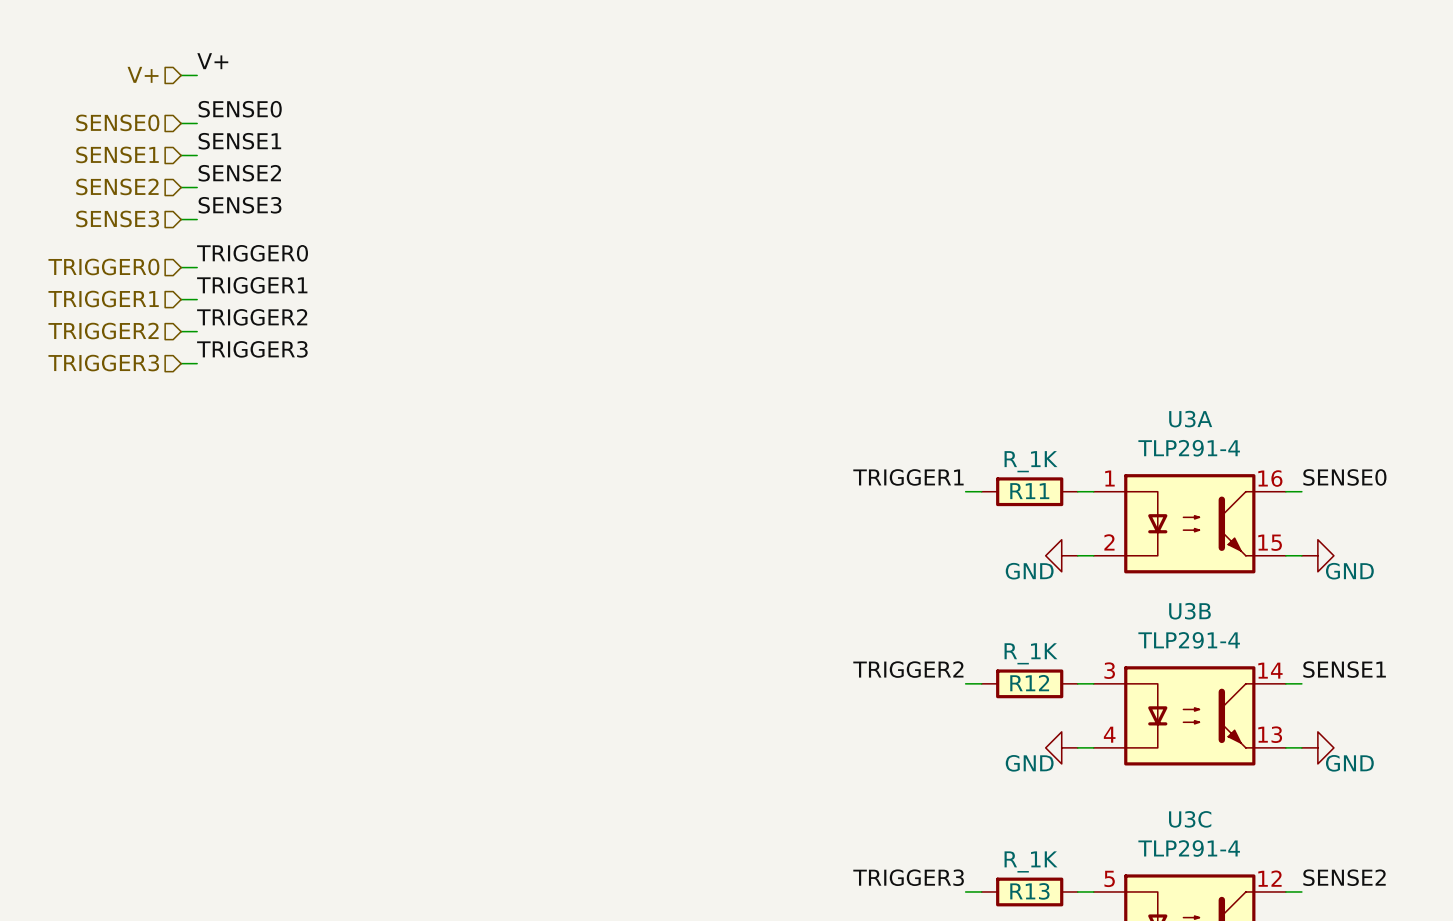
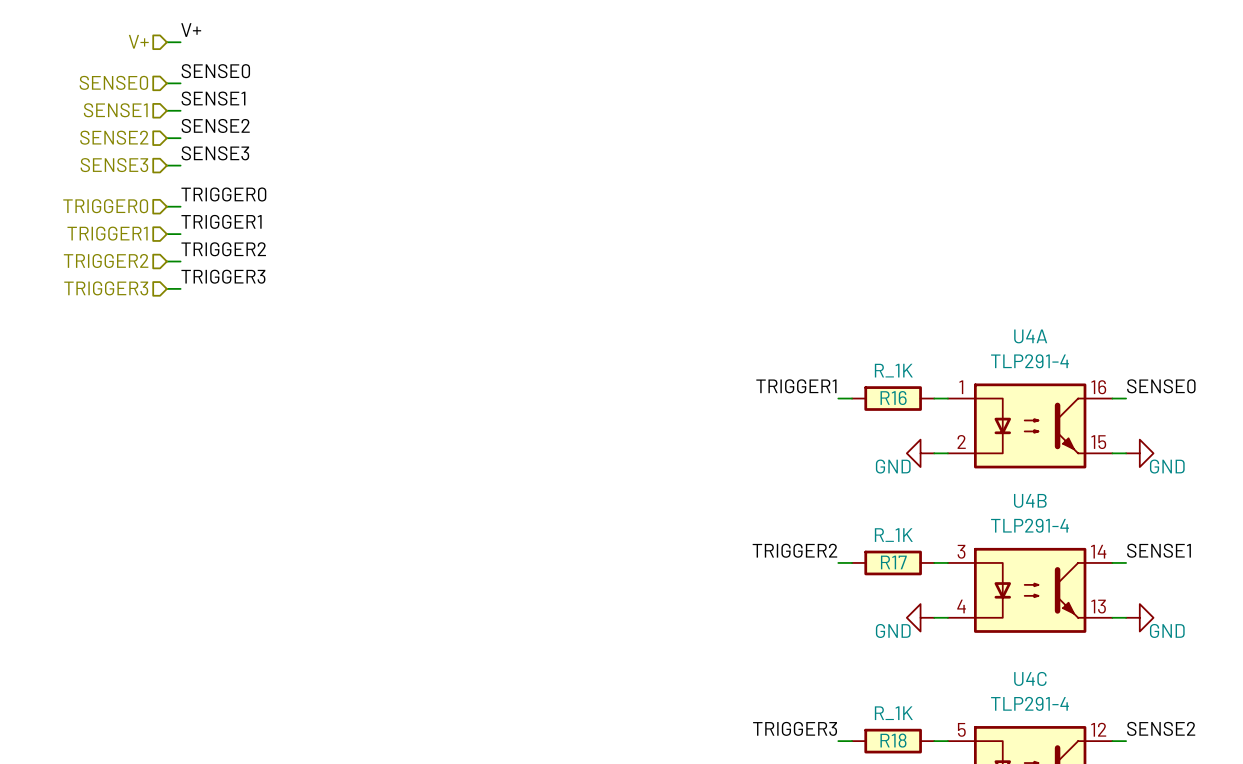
U3A name: U3A (1190, 419) -> U4A (1030, 336)
R11 name: R11 (1029, 491) -> R16 (893, 398)
U3B name: U3B (1189, 611) -> U4B (1030, 500)
R12 name: R12 (1029, 683) -> R17 (893, 562)
U3C name: U3C (1190, 819) -> U4C (1030, 678)
R13 name: R13 (1029, 891) -> R18 (893, 740)

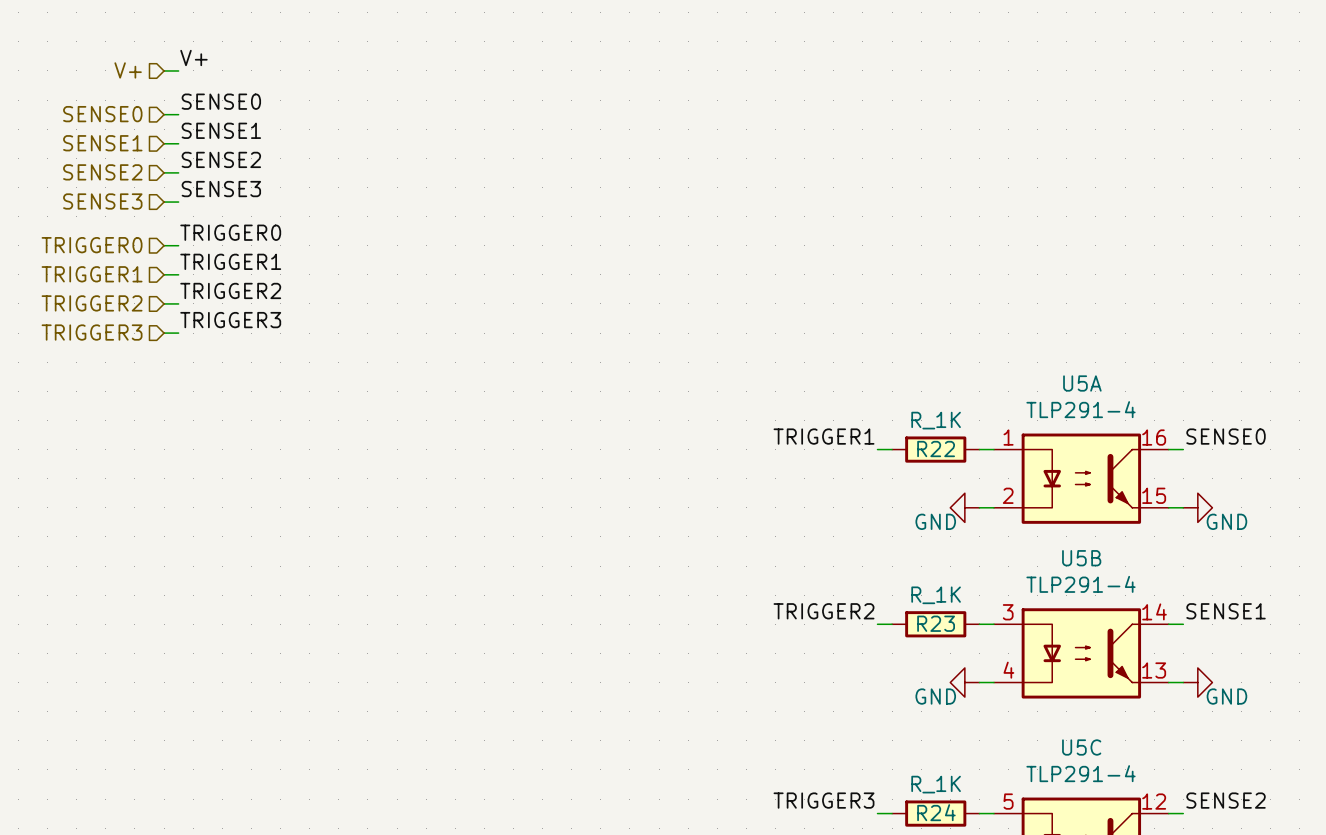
U4A name: U4A (1030, 336) -> U5A (1082, 383)
R16 name: R16 (893, 398) -> R22 (936, 449)
U4B name: U4B (1030, 500) -> U5B (1081, 558)
R17 name: R17 (893, 562) -> R23 (936, 623)
U4C name: U4C (1030, 678) -> U5C (1081, 747)
R18 name: R18 (893, 740) -> R24 (936, 812)

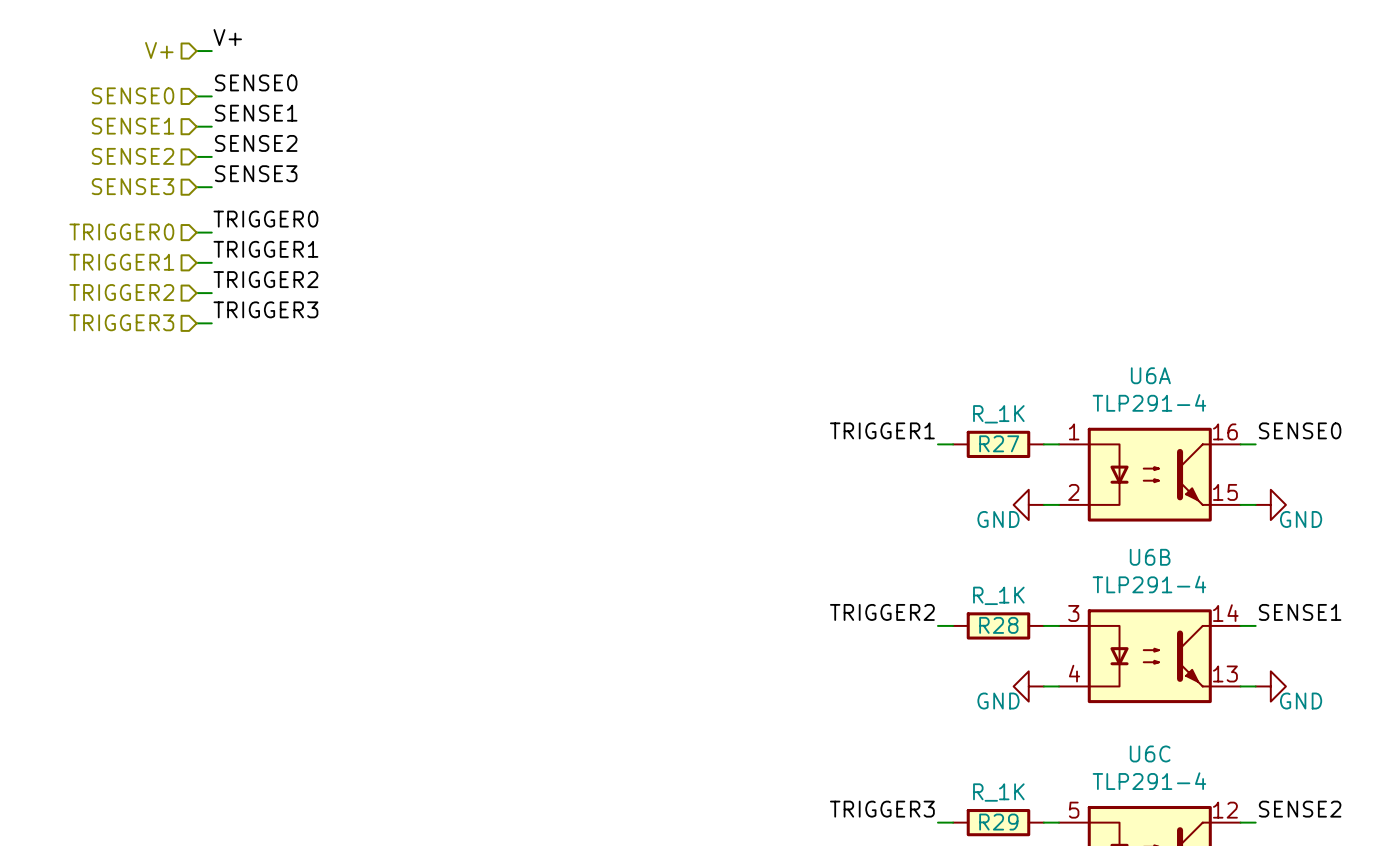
U5A name: U5A (1082, 383) -> U6A (1150, 375)
R22 name: R22 (936, 449) -> R27 (999, 443)
U5B name: U5B (1081, 558) -> U6B (1150, 557)
R23 name: R23 (936, 623) -> R28 (998, 625)
U5C name: U5C (1081, 747) -> U6C (1150, 753)
R24 name: R24 (936, 812) -> R29 (998, 822)

